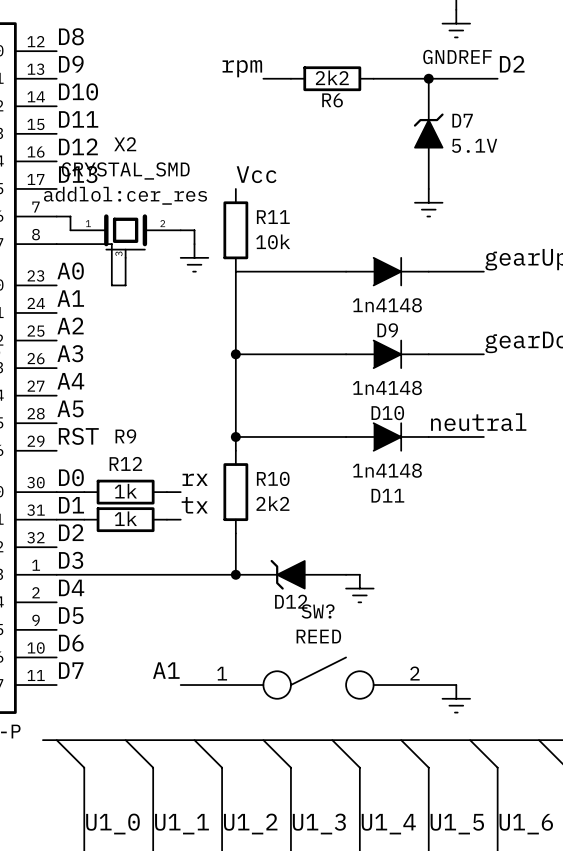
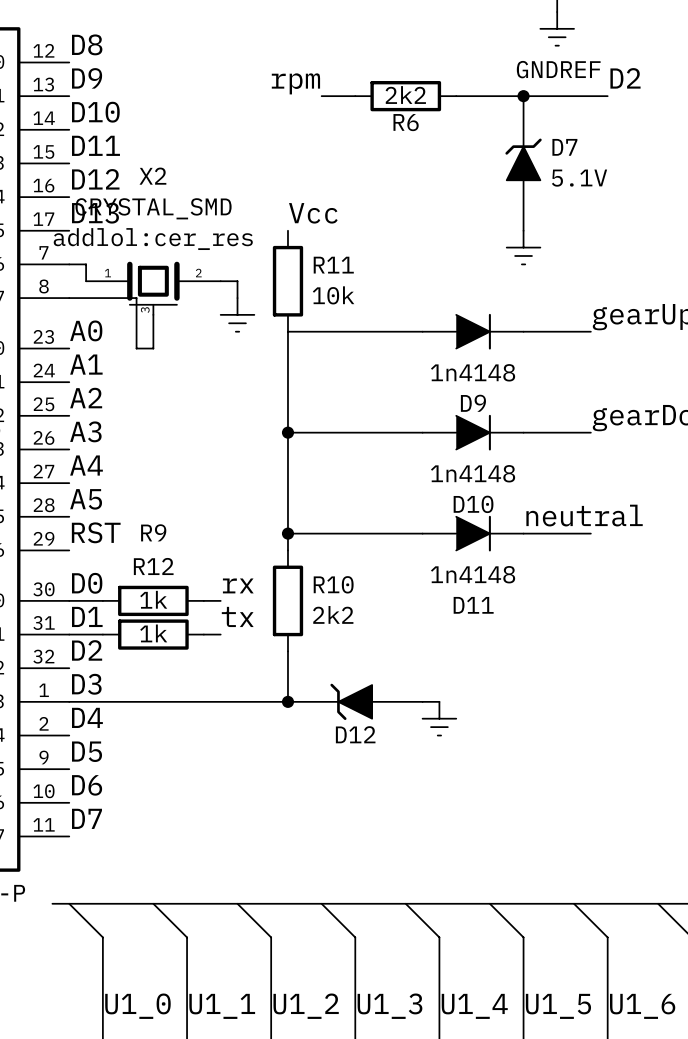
label: A1 (166, 670) -> none
SW?: REED (318, 678) -> none
power symbol: (456, 698) -> none

